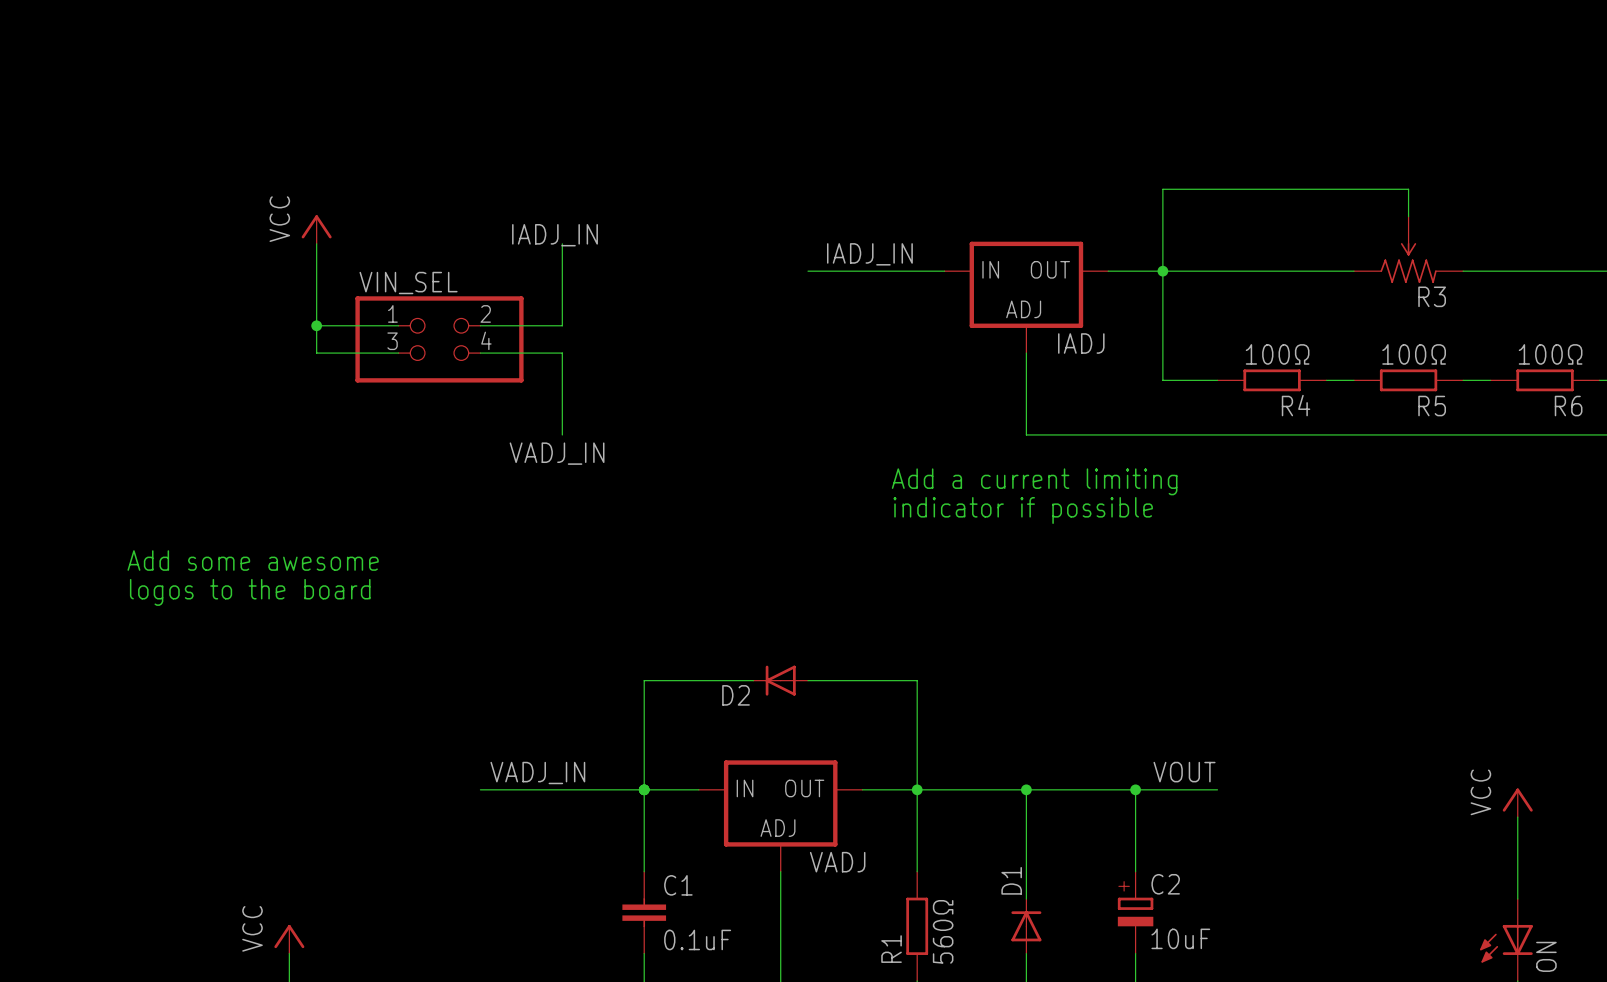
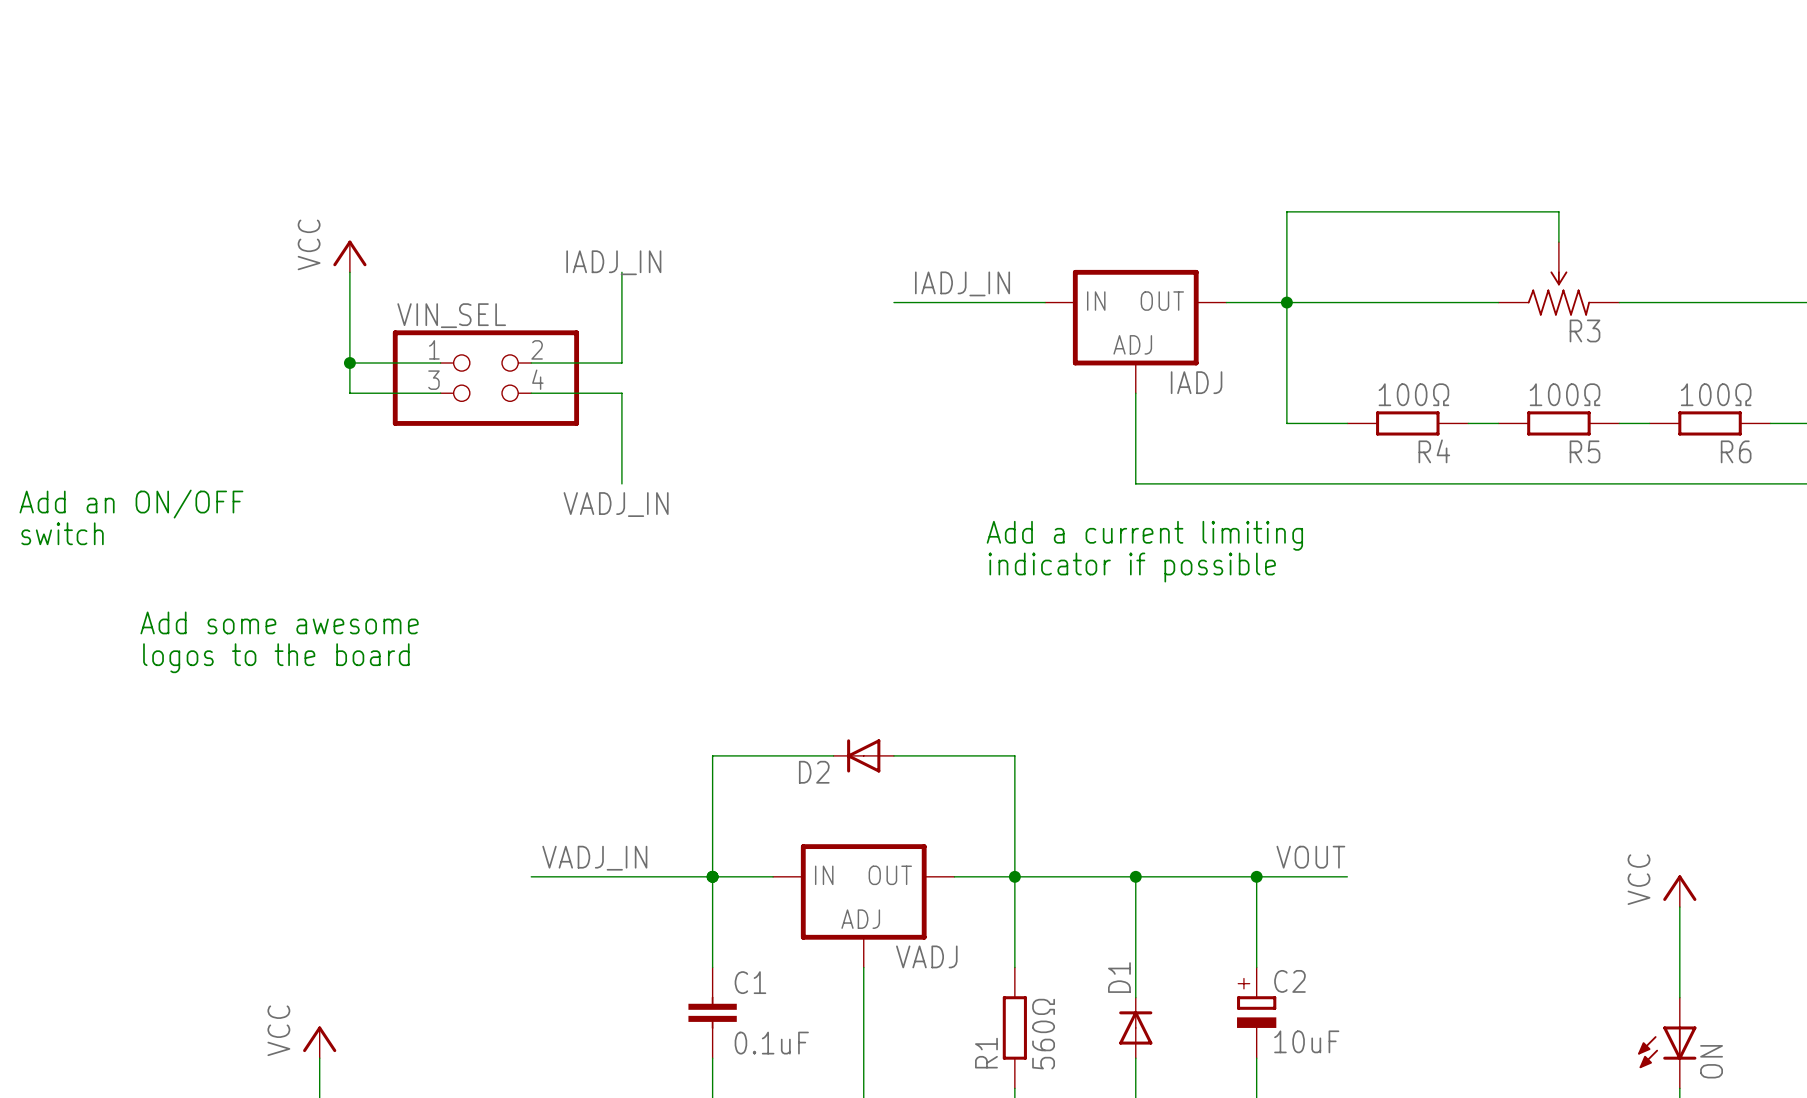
text: none -> Add an ON/OFF (131, 504)
text: none -> switch (62, 533)

